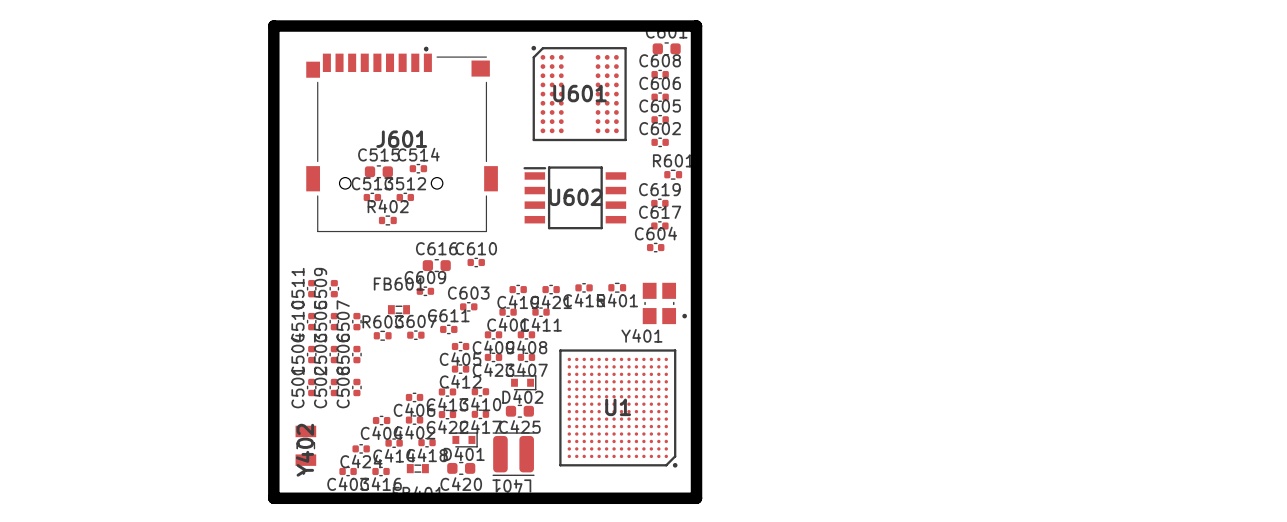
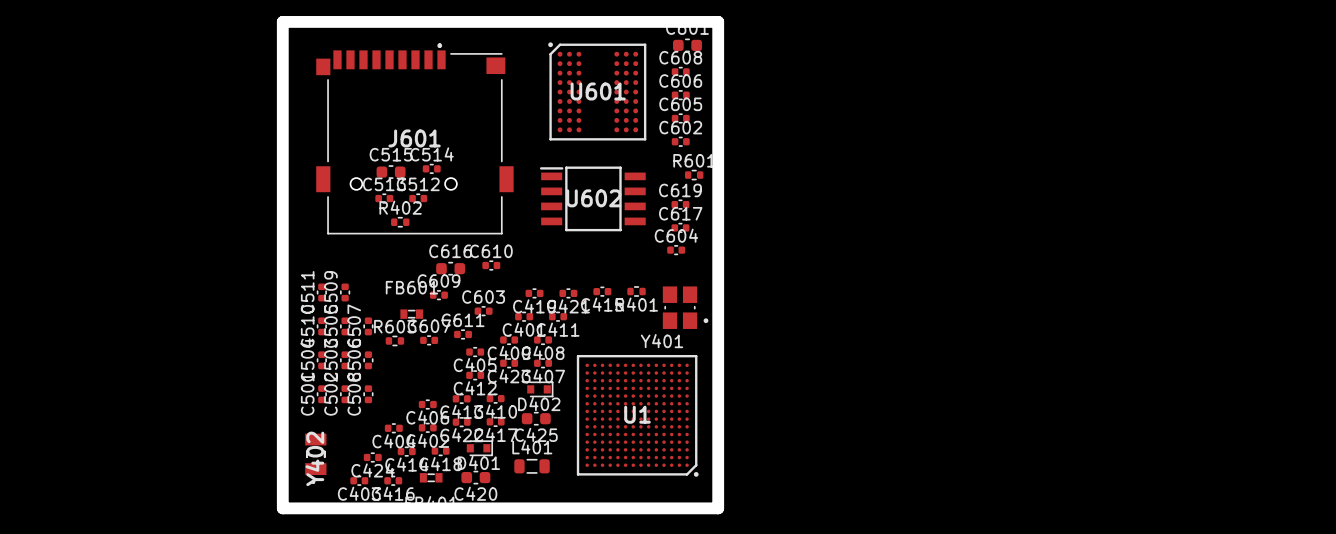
L401 footprint: [492, 432, 535, 477] -> [514, 459, 550, 474]
L401 name position: L401 (511, 486) -> L401 (532, 447)

